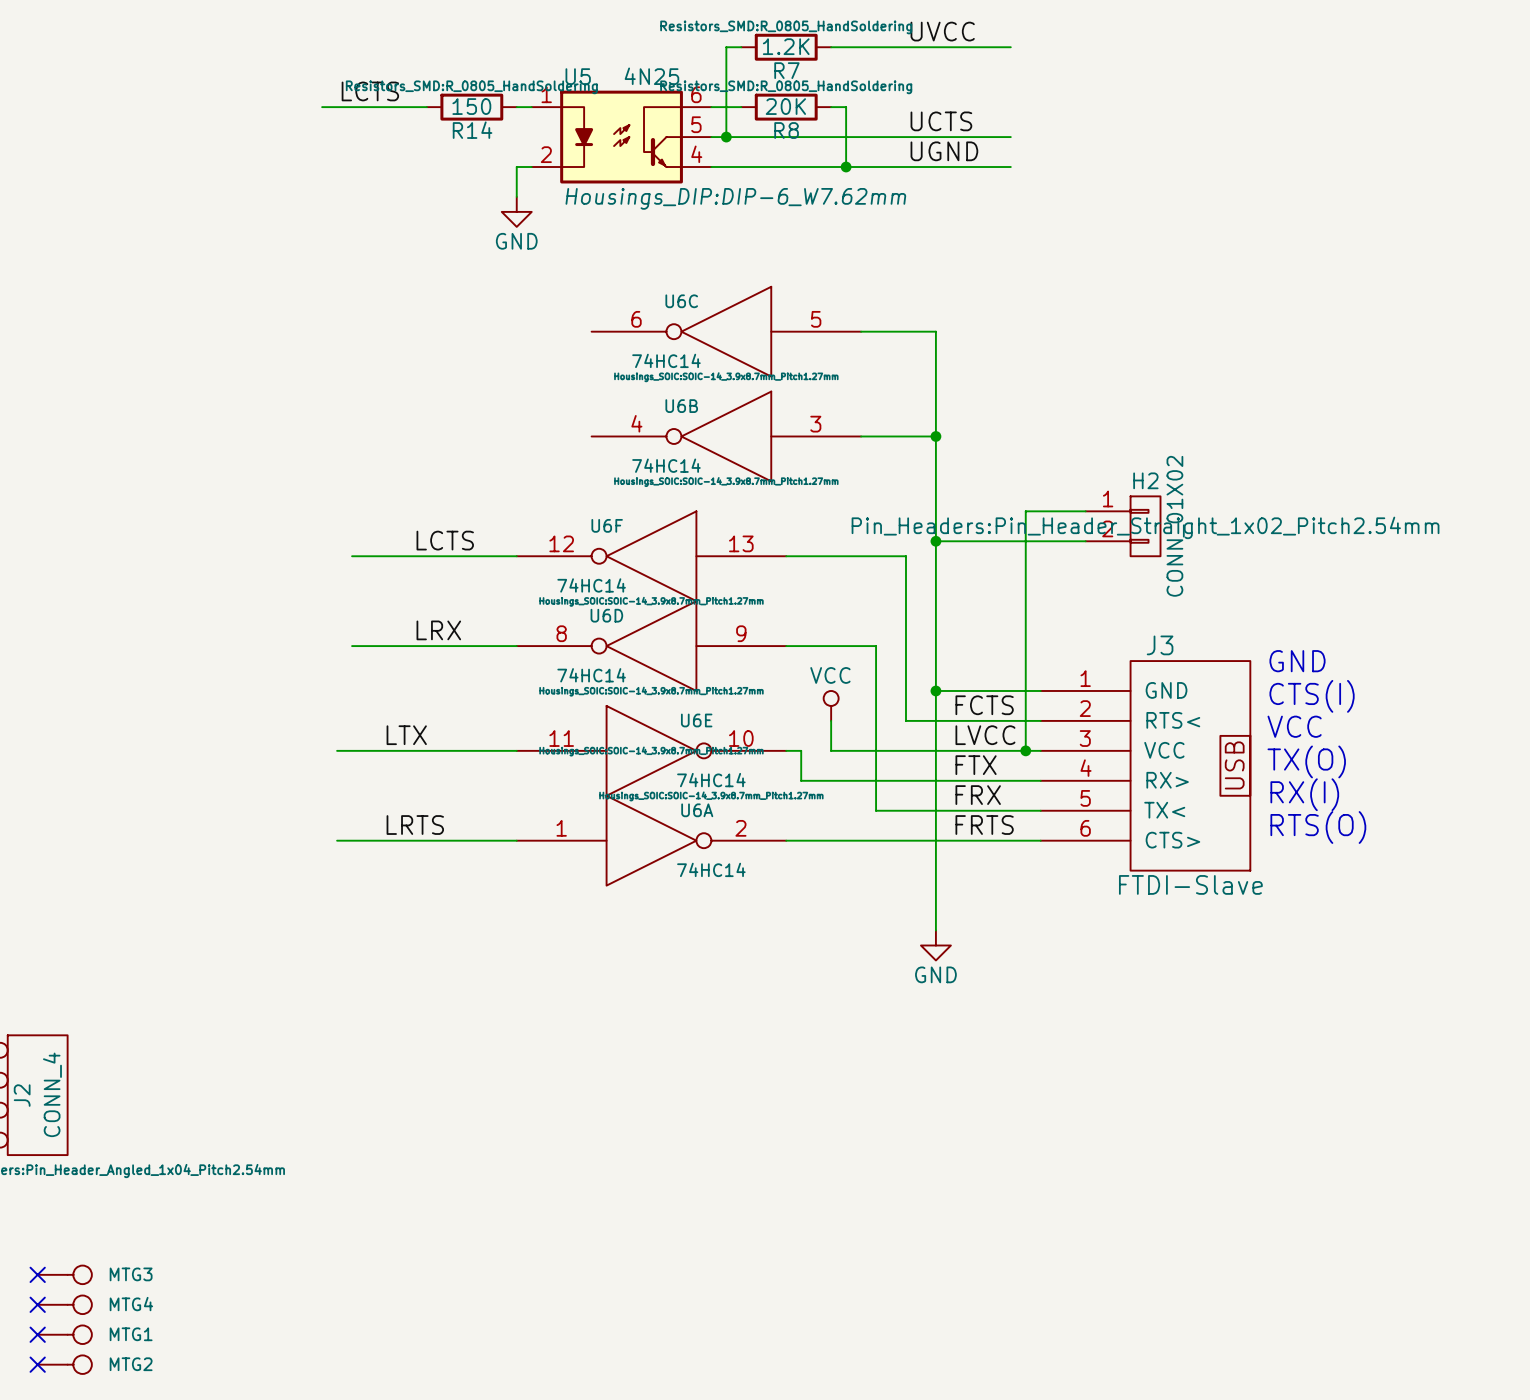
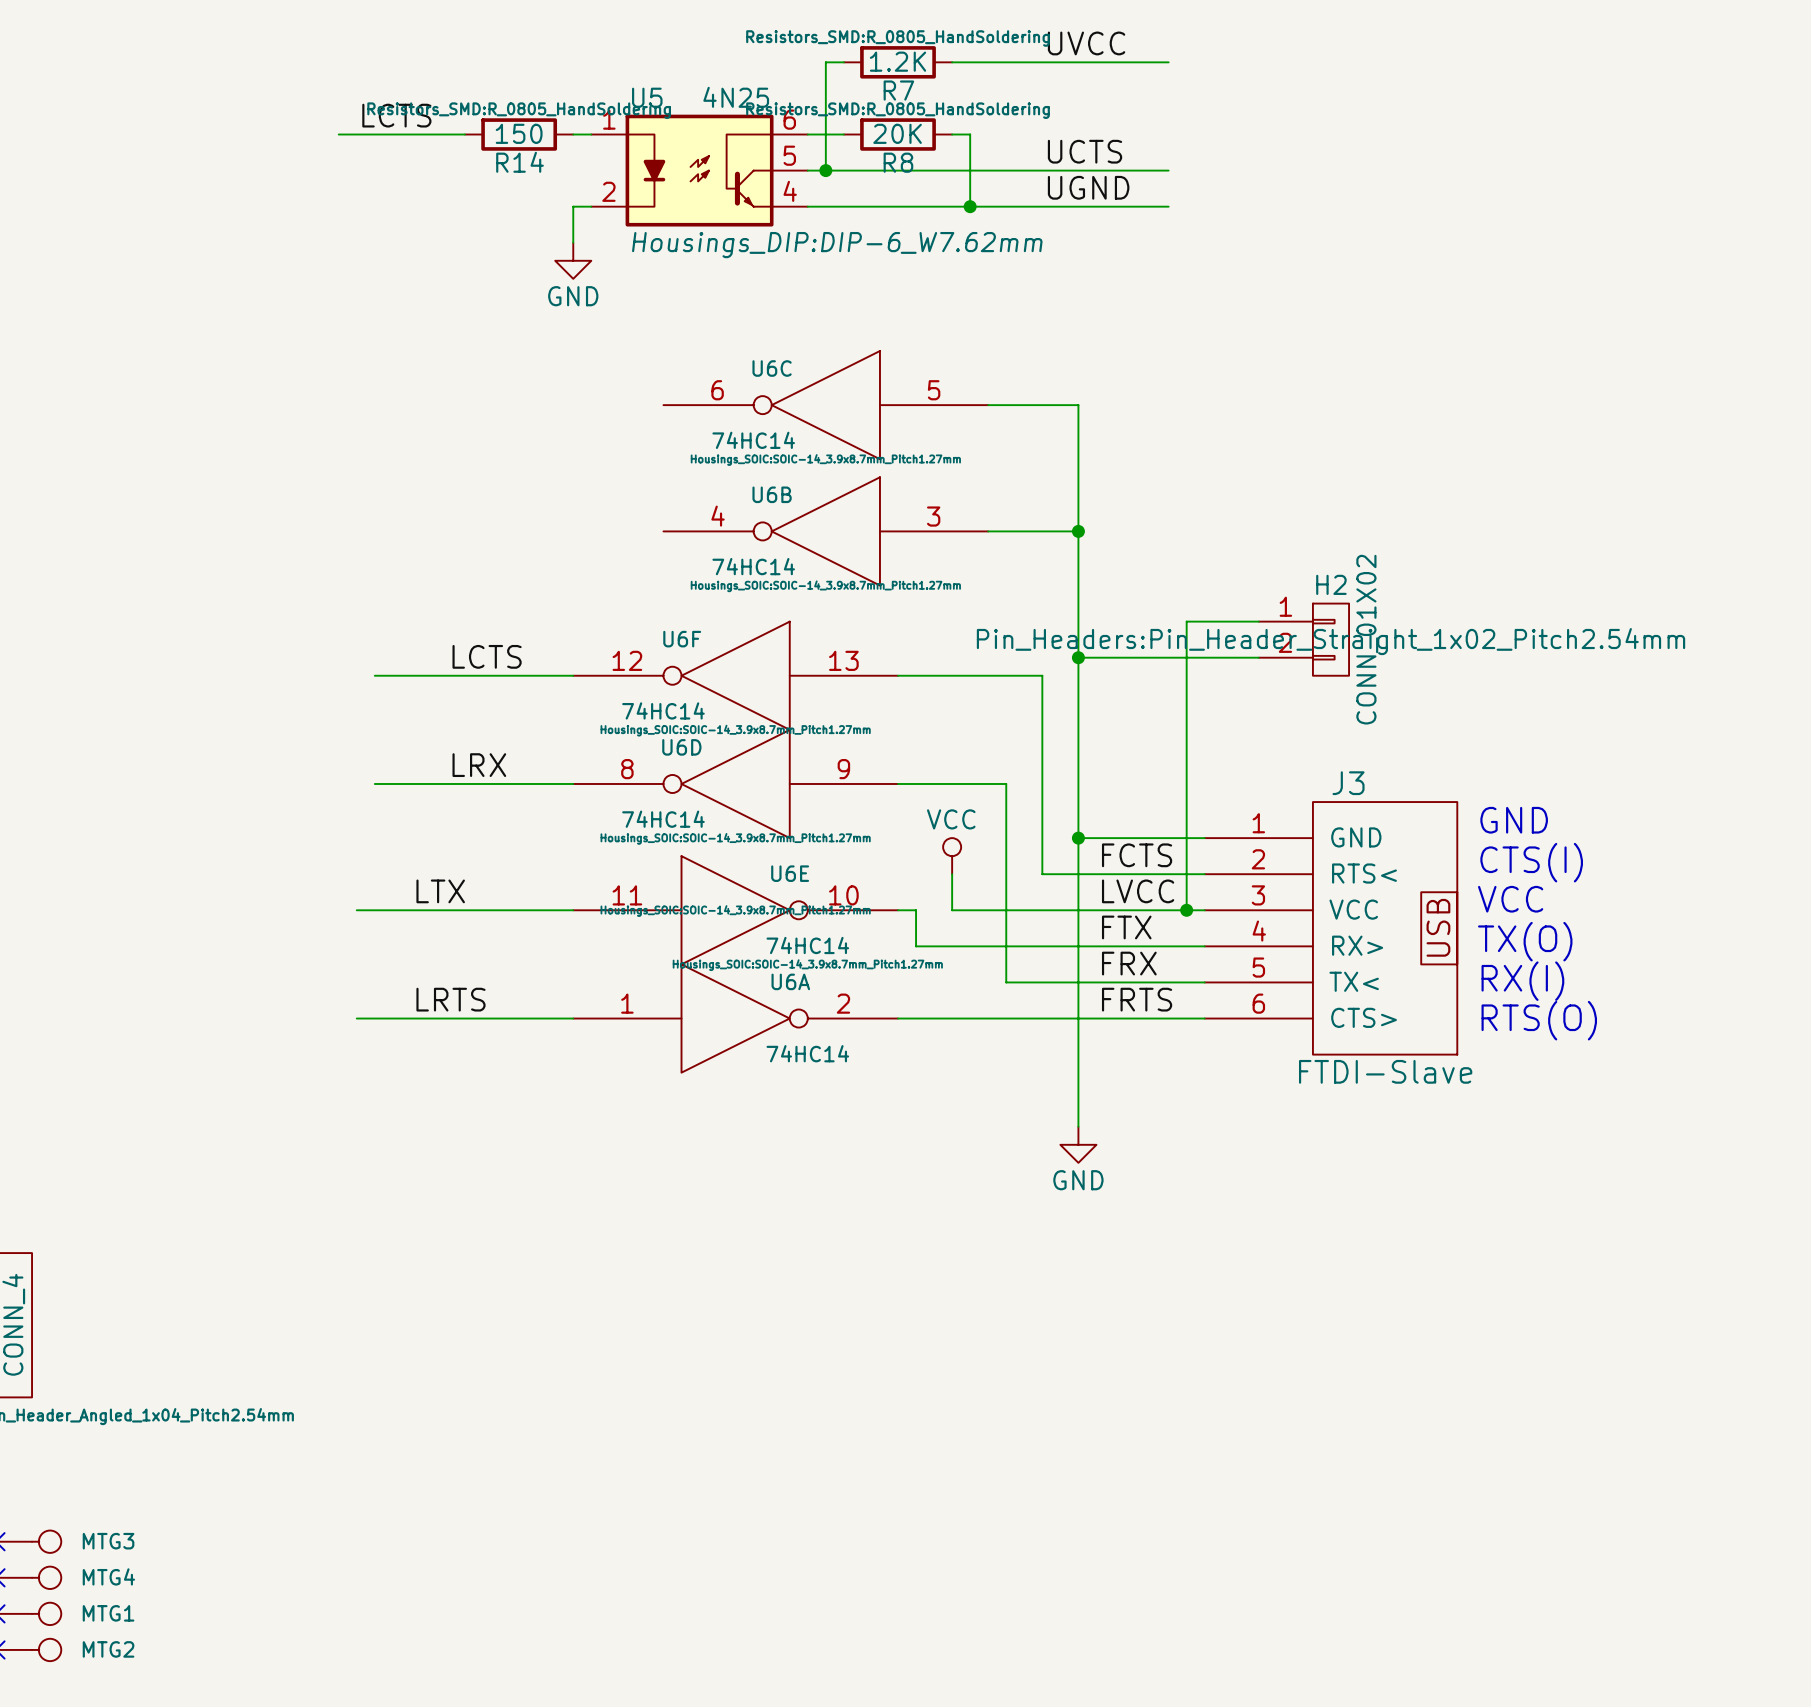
text position: GND (1297, 661) -> GND (1514, 820)
text position: CTS(I) (1312, 696) -> CTS(I) (1531, 862)
text position: VCC (1294, 726) -> VCC (1510, 899)
text position: TX(O) (1306, 761) -> TX(O) (1525, 941)
text position: RX(I) (1304, 794) -> RX(I) (1522, 981)
text position: RTS(O) (1318, 827) -> RTS(O) (1539, 1020)

